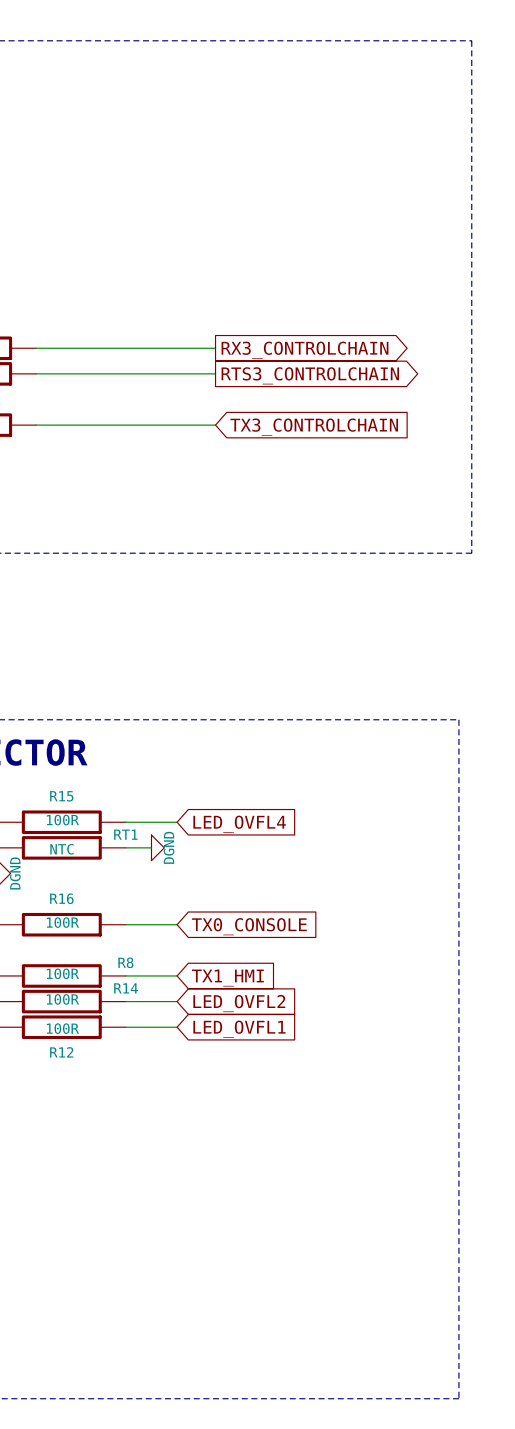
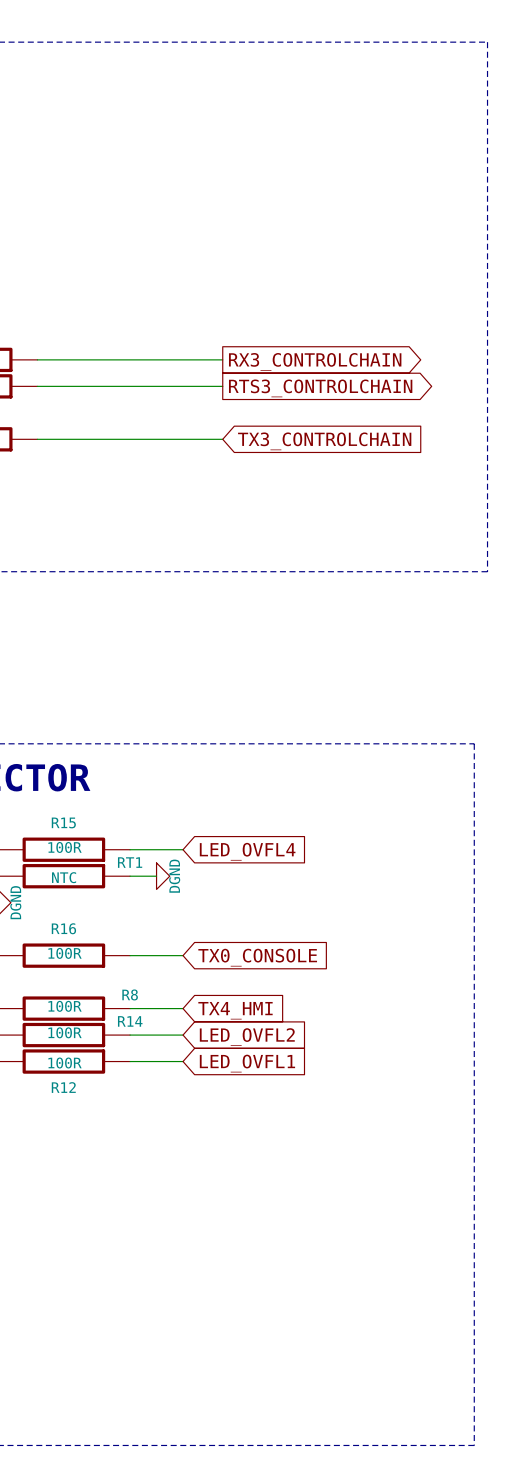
global label: TX1_HMI (227, 978) -> TX4_HMI (235, 1010)

